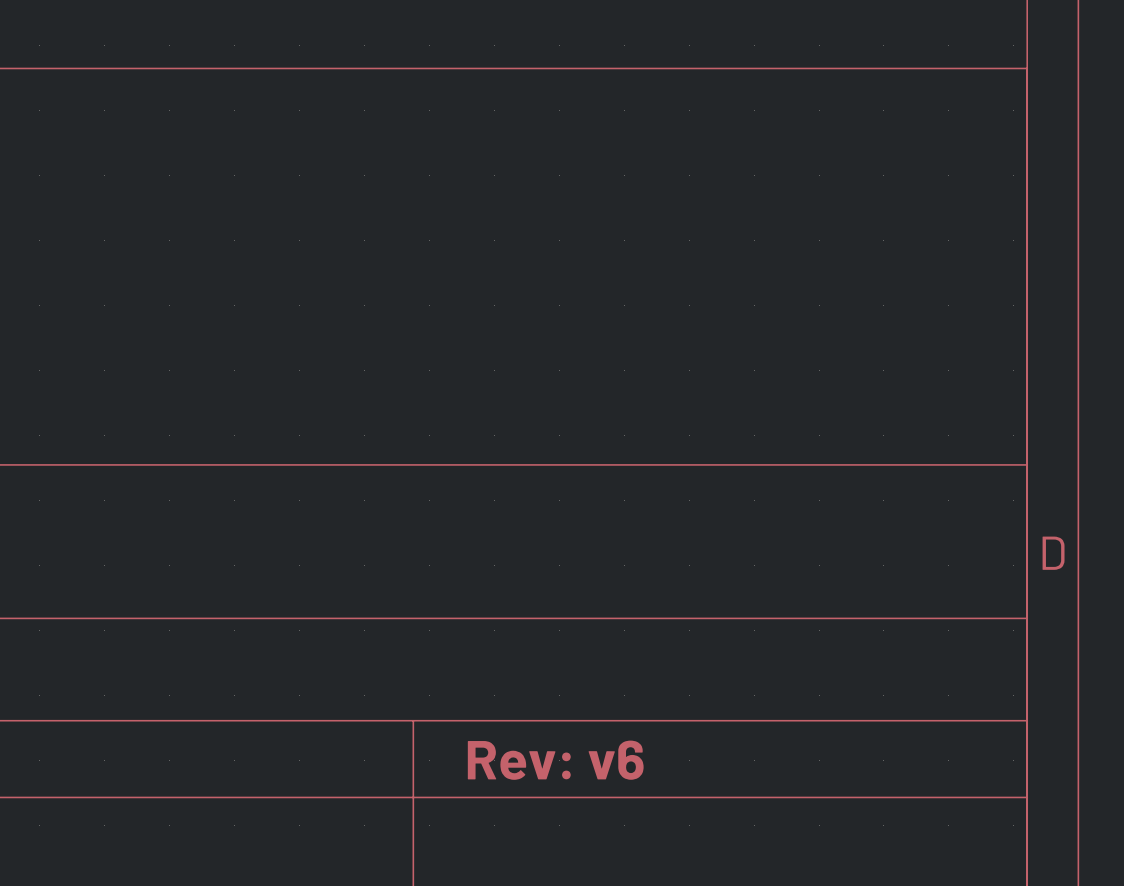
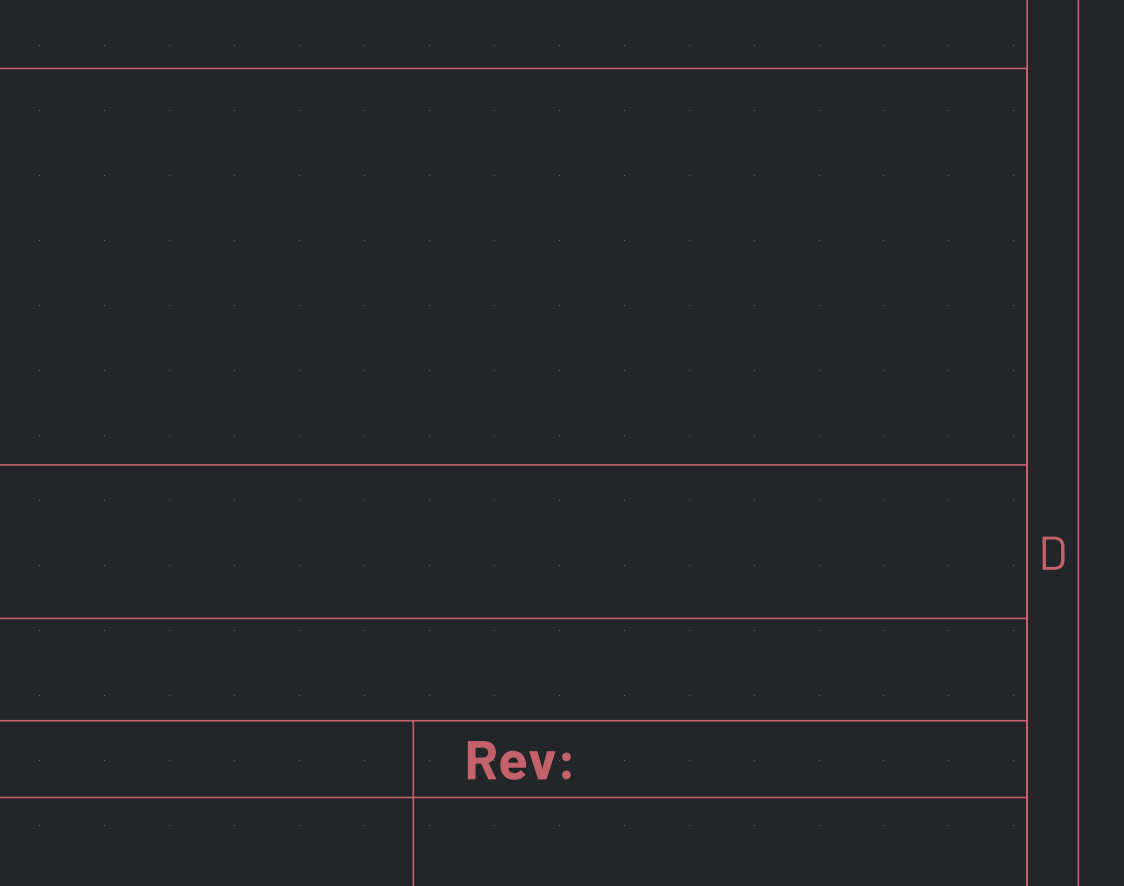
title block: Rev: v6 (555, 760) -> Rev: (519, 760)

